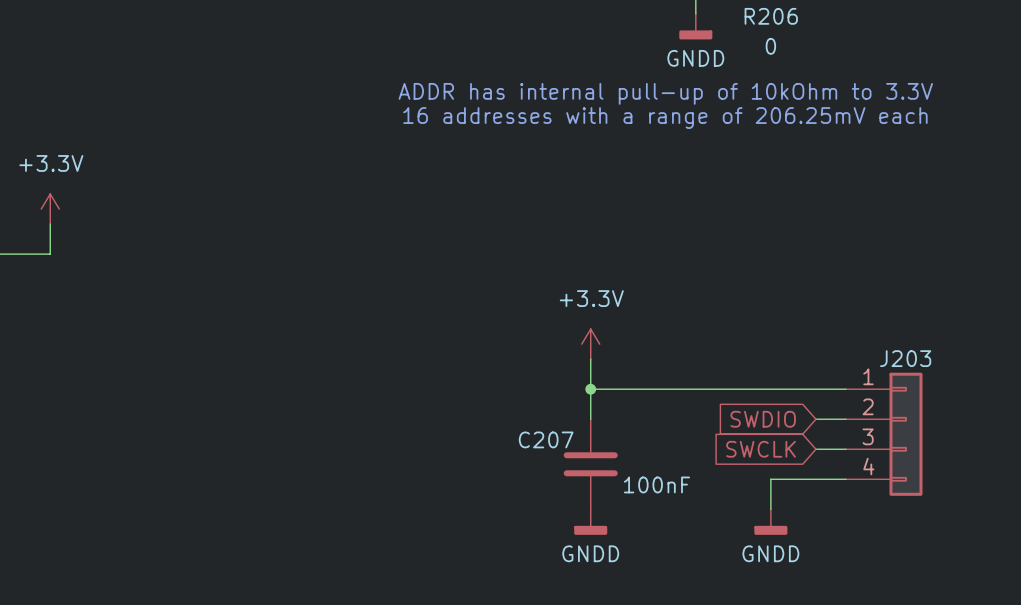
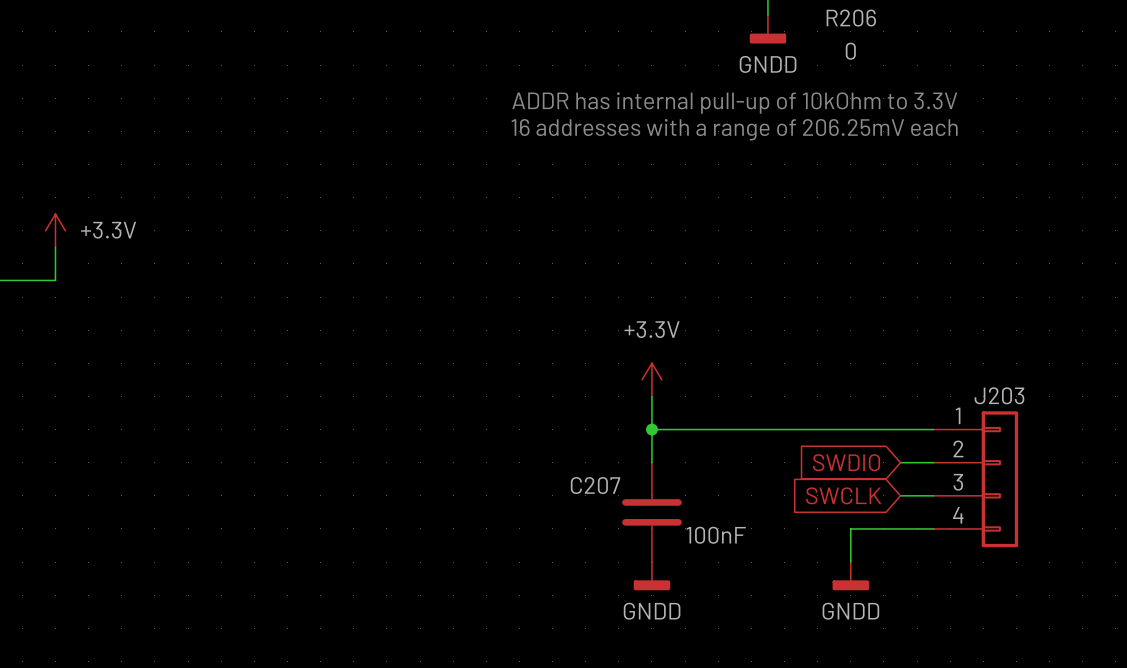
power symbol text position: +3.3V (51, 163) -> +3.3V (108, 230)

